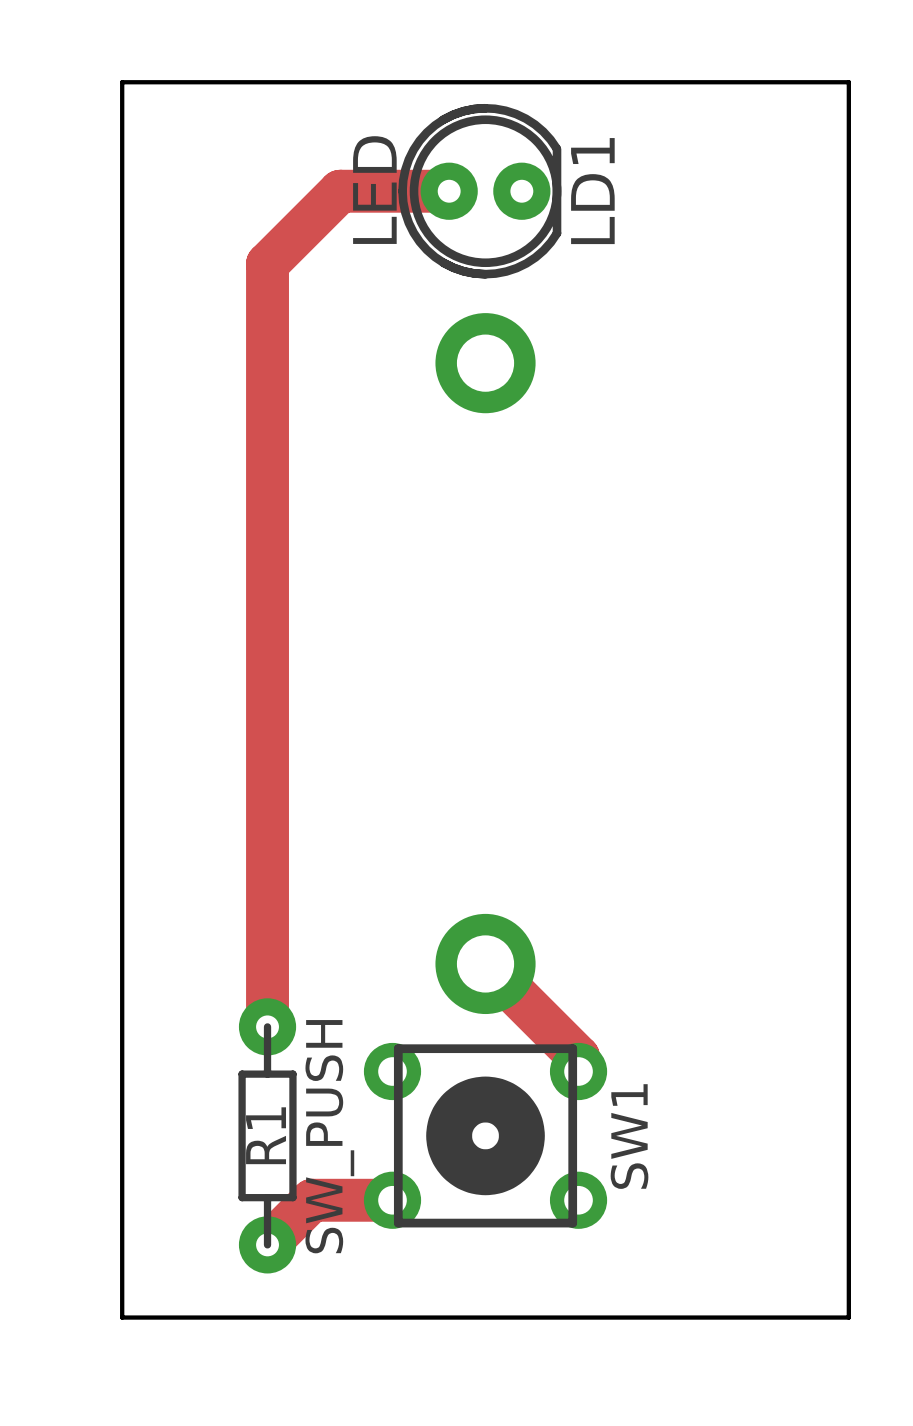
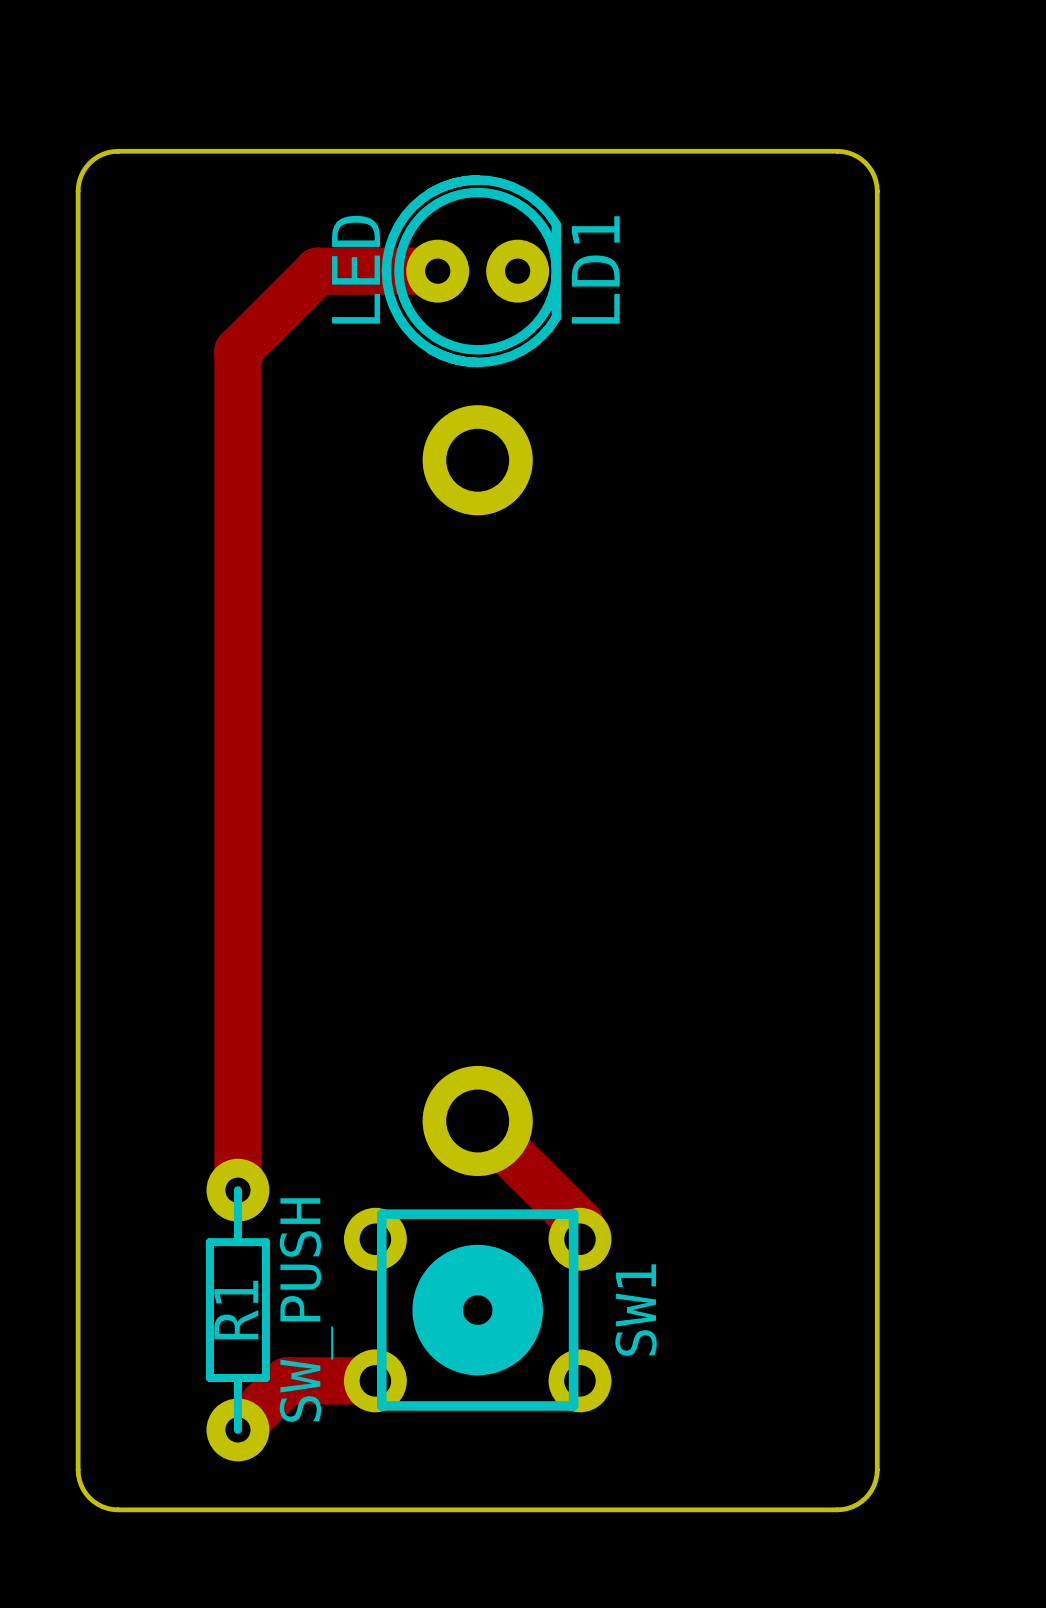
board edge: (158, 82) (122, 82) (122, 118) -> (118, 151) (102, 154) (89, 162) (81, 175) (78, 191)
board edge: (812, 82) (848, 82) (848, 118) -> (837, 151) (852, 154) (865, 162) (874, 175) (877, 191)
board edge: (122, 1281) (122, 1317) (158, 1317) -> (78, 1469) (81, 1485) (89, 1498) (102, 1506) (118, 1509)
board edge: (848, 1281) (848, 1317) (812, 1317) -> (877, 1469) (874, 1485) (865, 1498) (852, 1506) (837, 1509)

